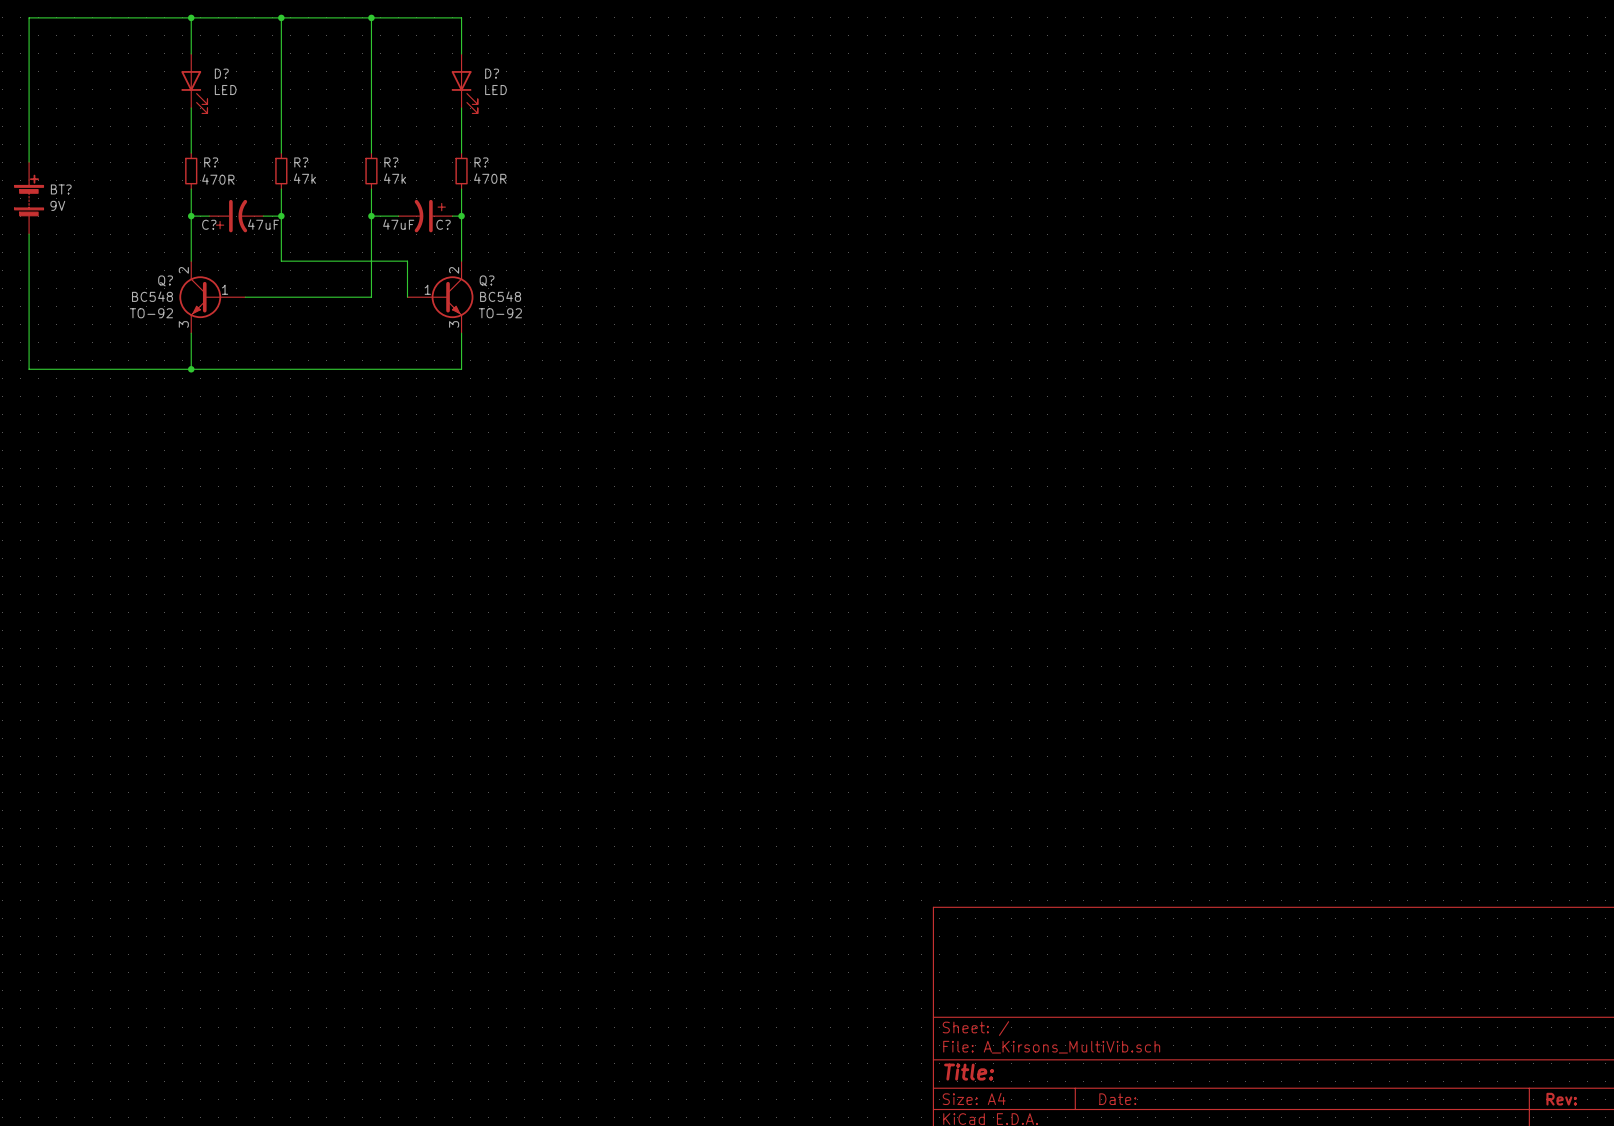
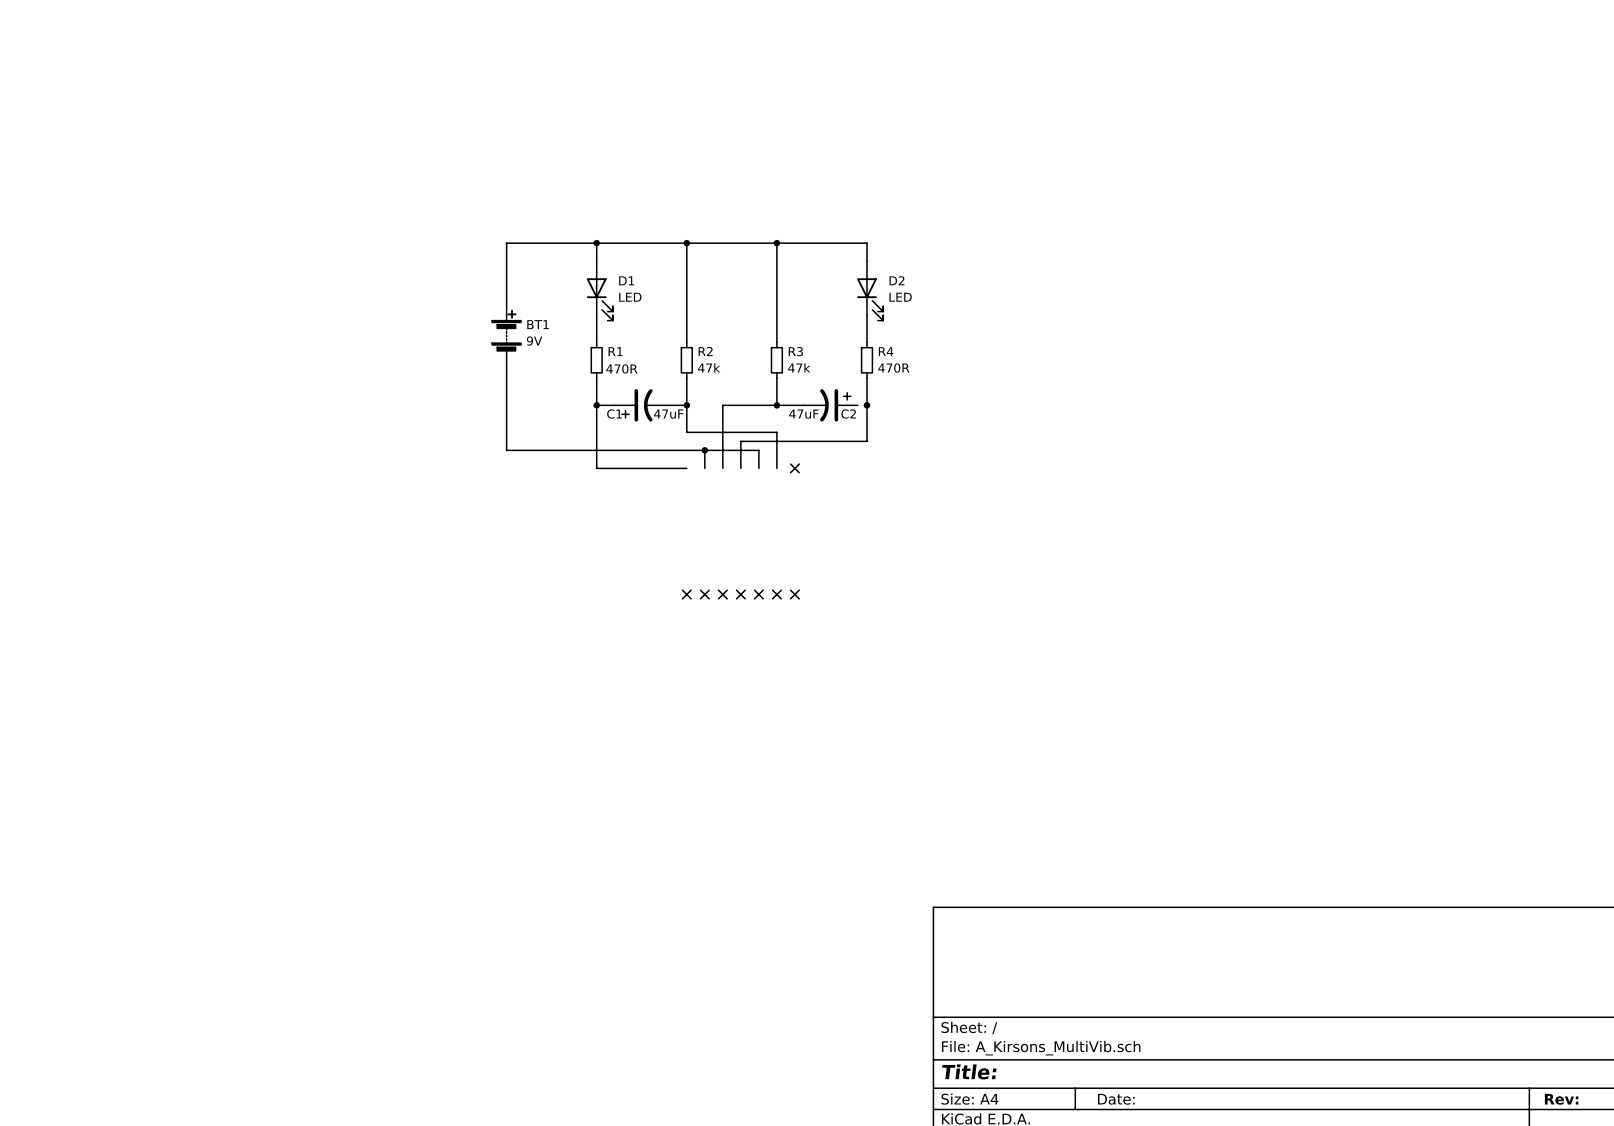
wire: (191, 17) (191, 53) -> none
junction: (191, 17) -> none
wire: (281, 17) (281, 153) -> none
junction: (281, 17) -> none
wire: (371, 17) (371, 153) -> none
junction: (371, 17) -> none
wire: (461, 53) (461, 17) (29, 17) (29, 162) -> none
D?: LED (194, 83) -> none
D?: LED (464, 83) -> none
wire: (191, 108) (191, 153) -> none
wire: (461, 108) (461, 153) -> none
R?: 470R (191, 171) -> none
R?: 47k (281, 171) -> none
R?: 47k (371, 171) -> none
R?: 470R (461, 171) -> none
wire: (191, 189) (191, 261) -> none
wire: (281, 189) (281, 261) (407, 261) (407, 297) -> none
wire: (371, 189) (371, 297) (245, 297) -> none
wire: (461, 189) (461, 261) -> none
BT?: 9V (29, 198) -> none
wire: (191, 216) (209, 216) -> none
junction: (191, 216) -> none
C?: 47uF (236, 216) -> none
wire: (263, 216) (281, 216) -> none
junction: (281, 216) -> none
wire: (371, 216) (398, 216) -> none
junction: (371, 216) -> none
C?: 47uF (425, 216) -> none
wire: (452, 216) (461, 216) -> none
junction: (461, 216) -> none
wire: (29, 234) (29, 369) (461, 369) (461, 333) -> none
wire: none -> (596, 243) (596, 261)
junction: none -> (596, 243)
wire: none -> (686, 243) (686, 342)
junction: none -> (686, 243)
wire: none -> (776, 243) (776, 342)
junction: none -> (776, 243)
wire: none -> (867, 261) (867, 243) (506, 243) (506, 297)
D1: none -> LED (599, 290)
D2: none -> LED (870, 290)
Q?: BC548 (212, 297) -> none
Q?: BC548 (440, 297) -> none
wire: none -> (596, 315) (596, 342)
wire: none -> (867, 315) (867, 342)
wire: (191, 333) (191, 369) -> none
BT1: none -> 9V (506, 333)
R1: none -> 470R (596, 360)
R2: none -> 47k (686, 360)
R3: none -> 47k (776, 360)
R4: none -> 470R (867, 360)
junction: (191, 369) -> none
wire: none -> (506, 369) (506, 450) (758, 450) (758, 468)
wire: none -> (596, 378) (596, 468) (686, 468)
wire: none -> (686, 378) (686, 432) (776, 432) (776, 468)
wire: none -> (776, 378) (776, 405)
wire: none -> (867, 378) (867, 441) (740, 441) (740, 468)
wire: none -> (596, 405) (614, 405)
junction: none -> (596, 405)
C1: none -> 47uF (641, 405)
wire: none -> (668, 405) (686, 405)
junction: none -> (686, 405)
junction: none -> (776, 405)
wire: none -> (803, 405) (722, 405) (722, 468)
C2: none -> 47uF (830, 405)
junction: none -> (867, 405)
wire: none -> (704, 450) (704, 468)
junction: none -> (704, 450)
no-connect mark: none -> (794, 468)
no-connect mark: none -> (686, 594)
no-connect mark: none -> (704, 594)
no-connect mark: none -> (722, 594)
no-connect mark: none -> (740, 594)
no-connect mark: none -> (758, 594)
no-connect mark: none -> (776, 594)
no-connect mark: none -> (794, 594)

